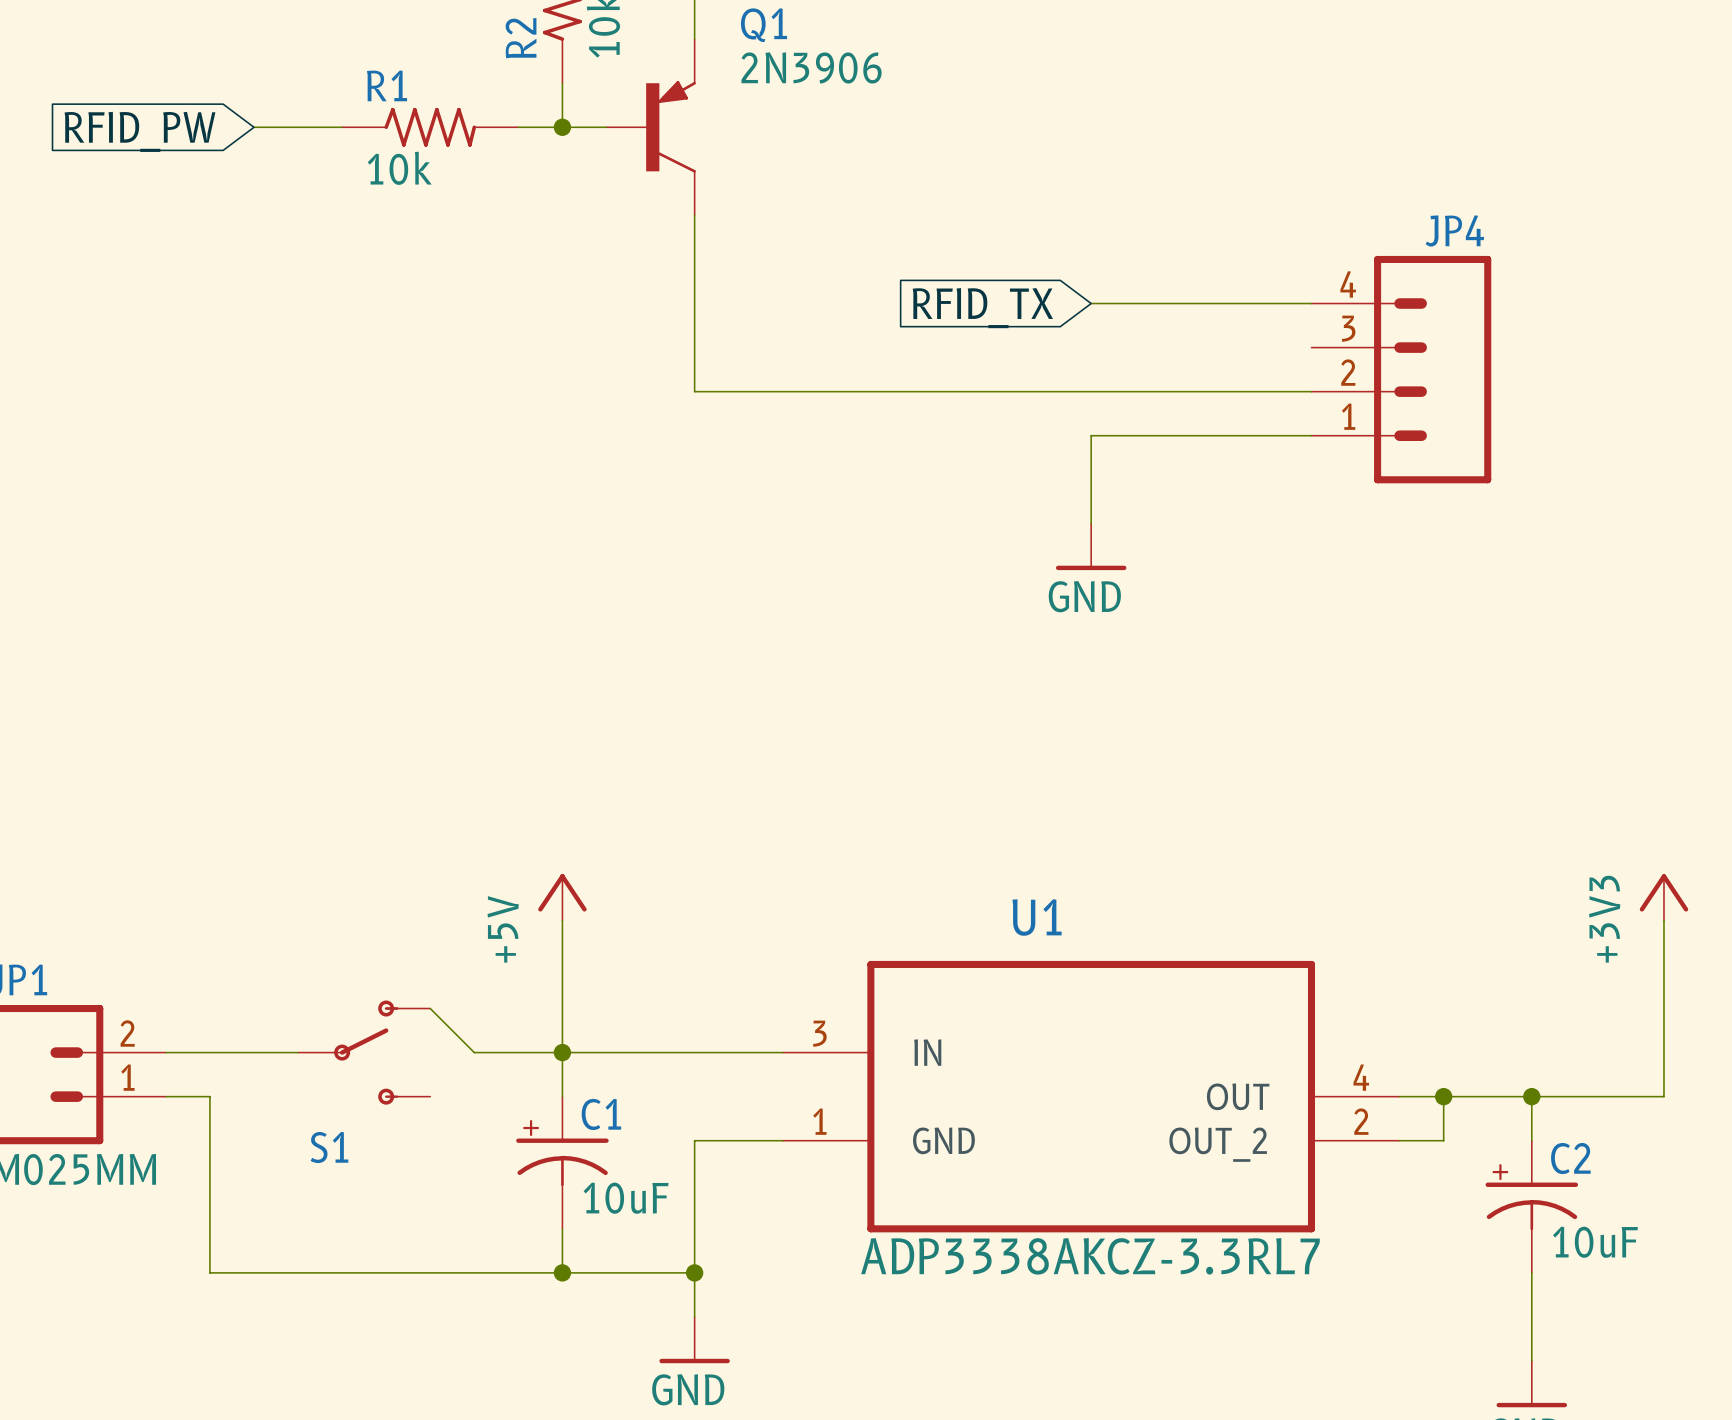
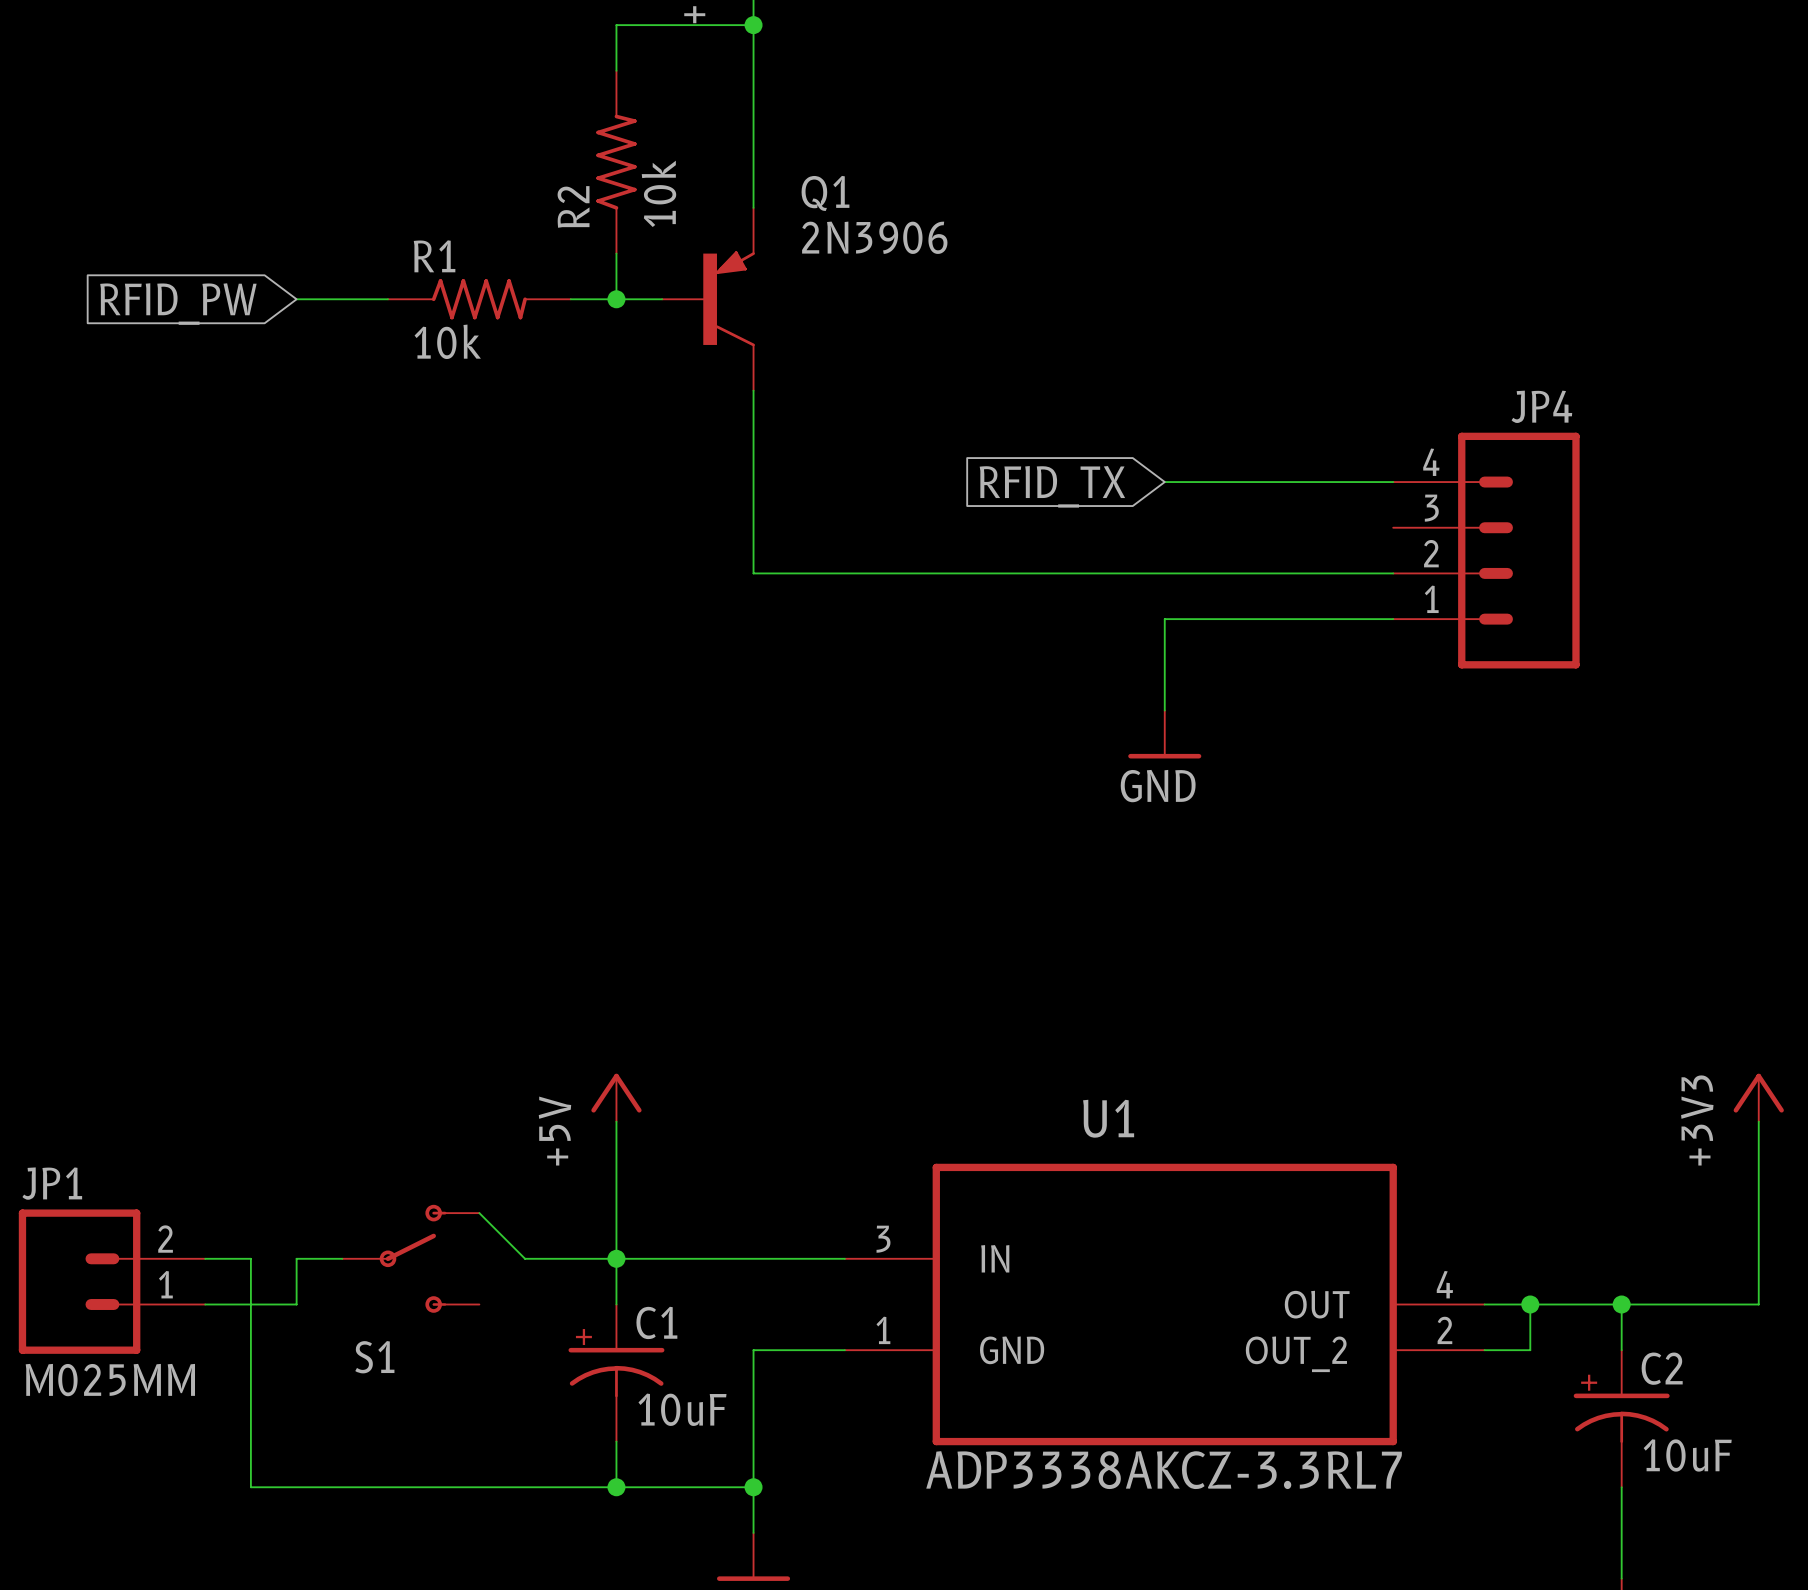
wire: (209, 1052) (254, 1052) -> (250, 1258) (250, 1304) (296, 1304) (296, 1258)

